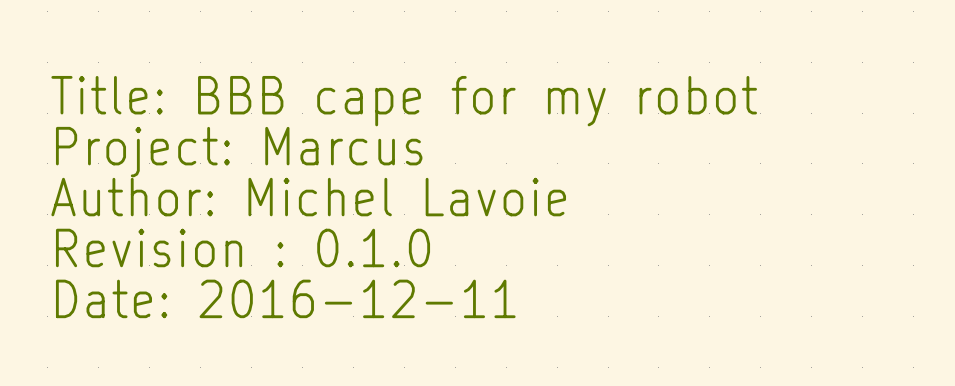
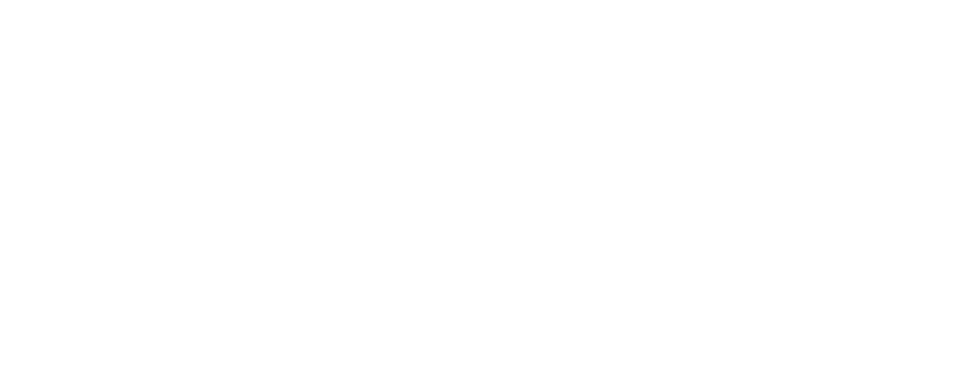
text: Title: BBB cape for my robot (404, 101) -> none
text: Project: Marcus (239, 152) -> none
text: Author: Michel Lavoie (308, 197) -> none
text: Revision : 0.1.0 (243, 247) -> none
text: Date: 2016-12-11 (285, 298) -> none

